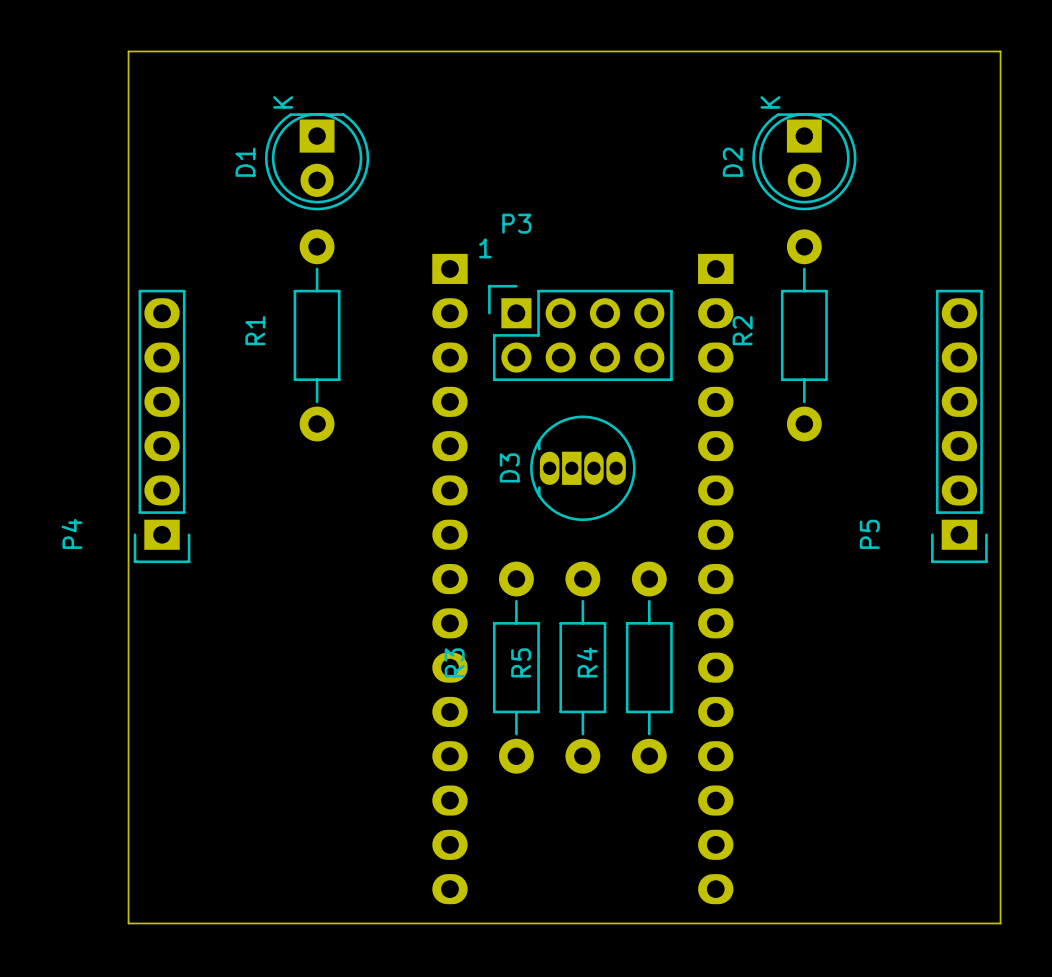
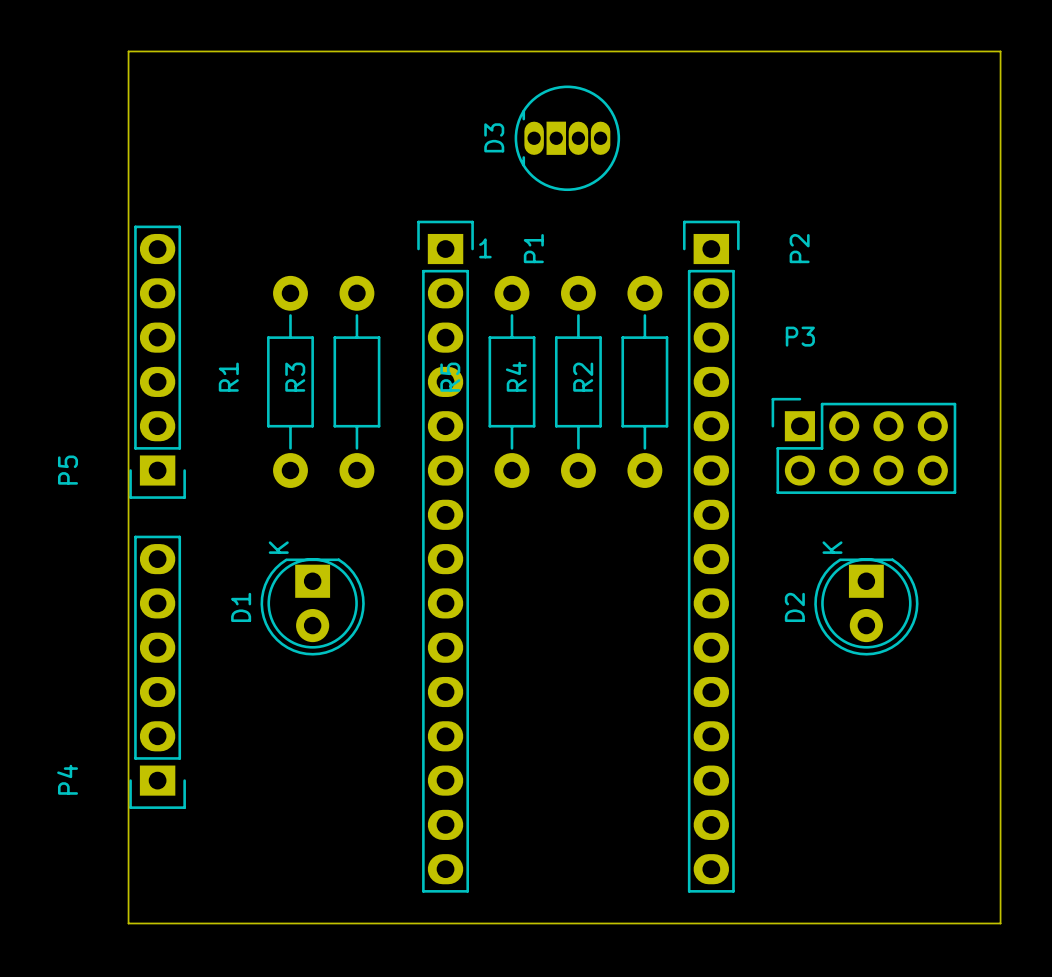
D1 position: (317, 161) -> (312, 606)
D2 position: (804, 161) -> (866, 606)
P3 position: (580, 332) -> (863, 445)
R1 position: (317, 335) -> (290, 381)
R2 position: (804, 335) -> (644, 381)
P4 position: (162, 426) -> (157, 672)
P5 position: (959, 426) -> (157, 362)
D3 position: (582, 468) -> (567, 138)
P2 side: bottom (449, 579) -> top (711, 556)
P1 side: bottom (715, 579) -> top (445, 556)
R3 position: (516, 667) -> (356, 381)
R5 position: (582, 667) -> (511, 381)
R4 position: (649, 667) -> (578, 381)

